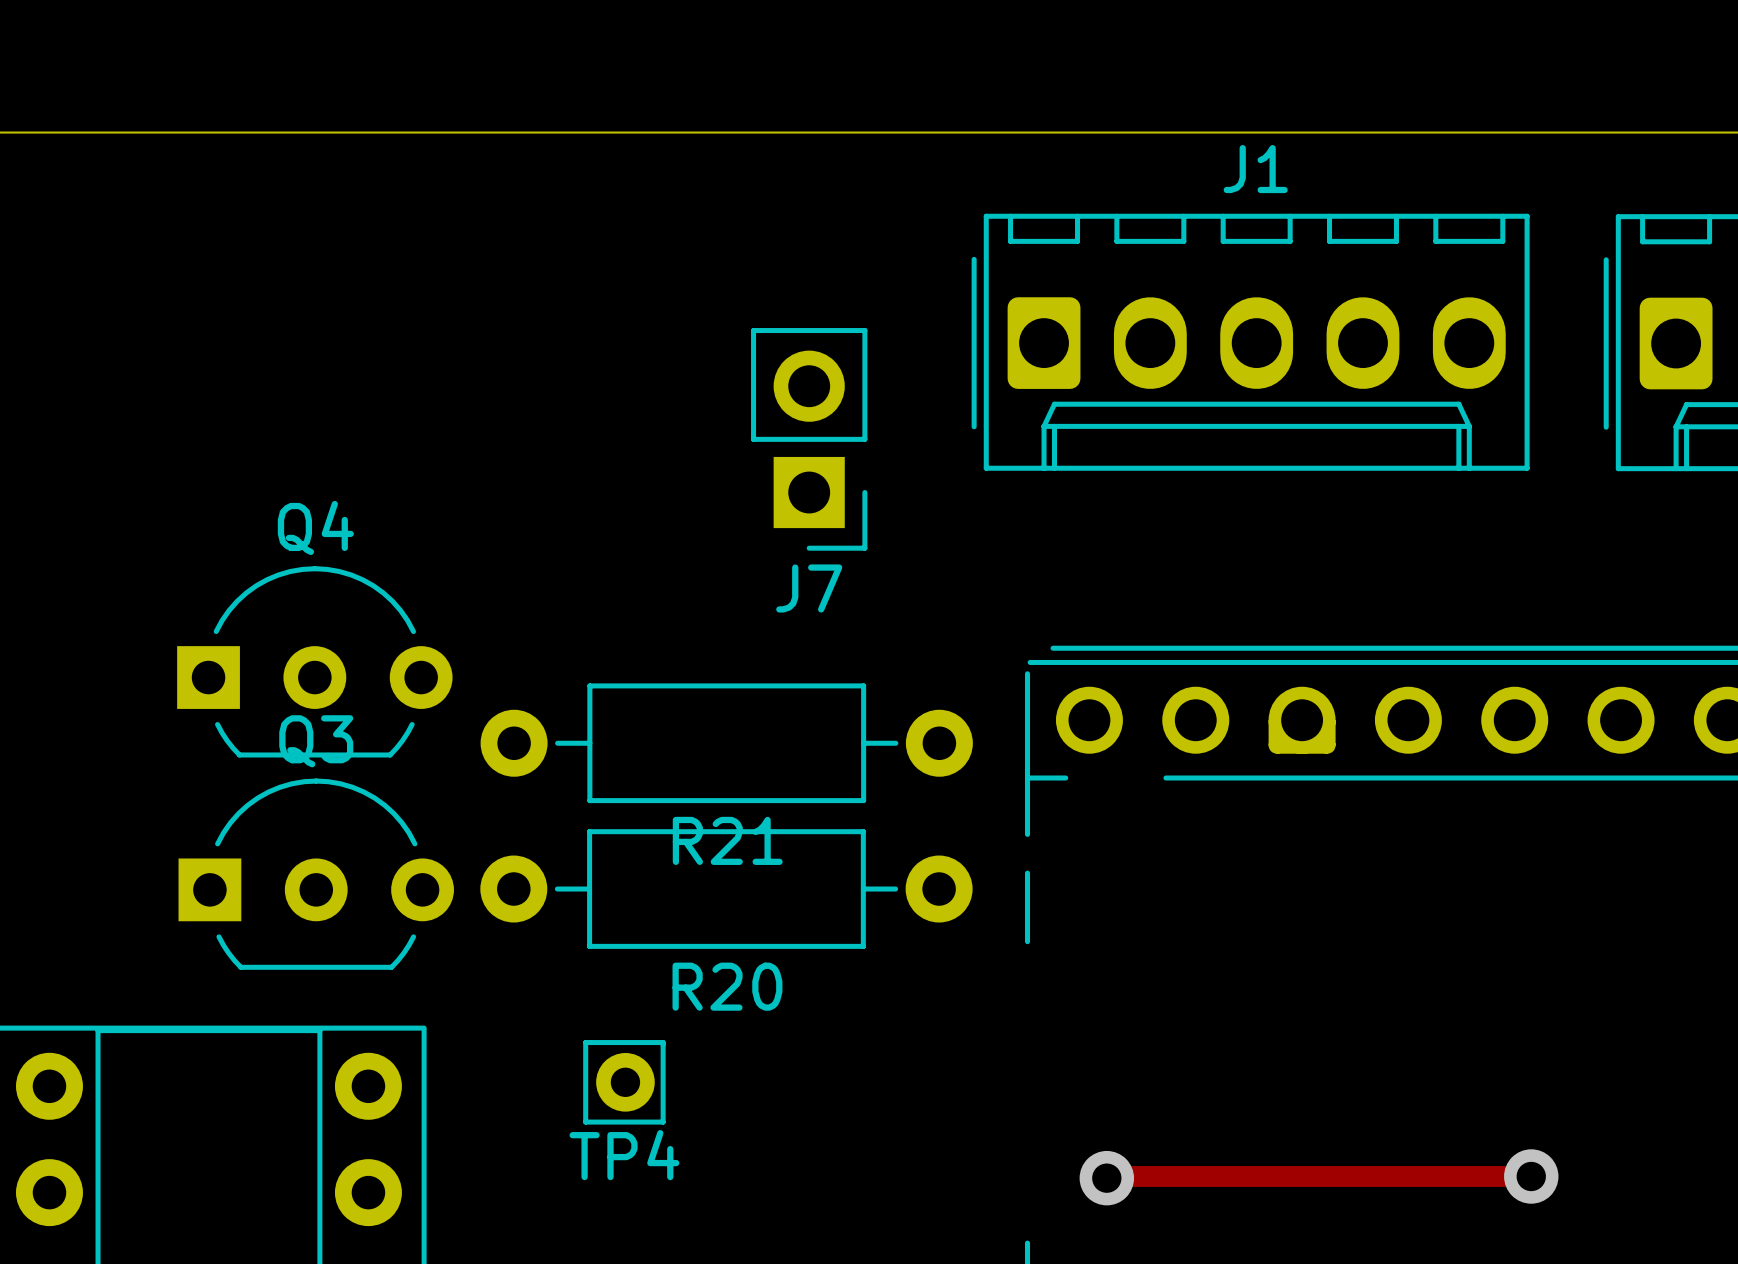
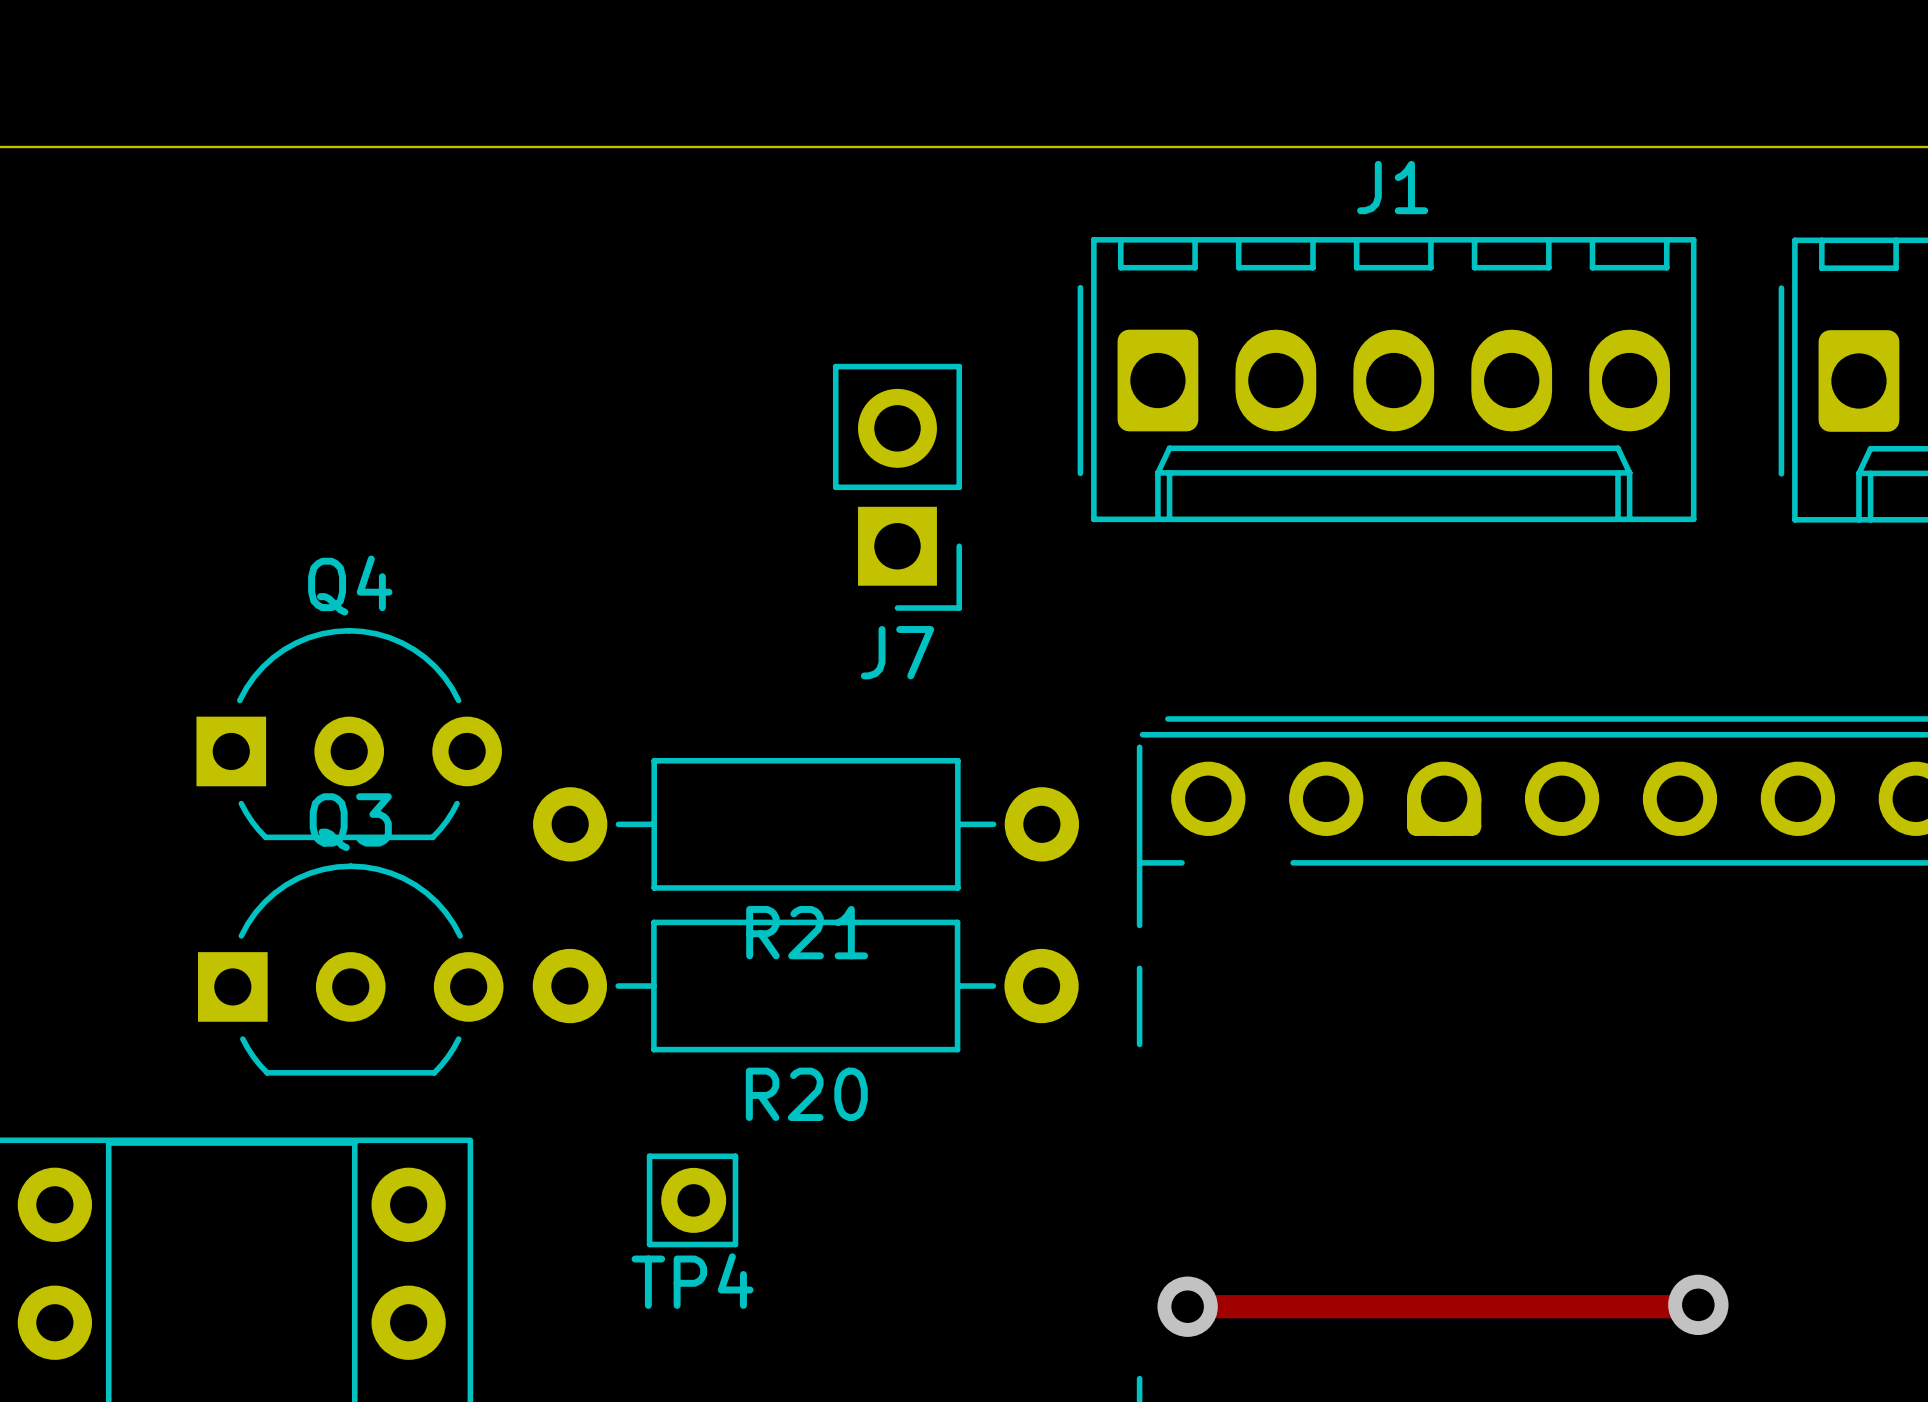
track: (1531, 1176) (1108, 1176) (1106, 1178) -> (1698, 1304) (1696, 1306) (1187, 1306)
via position: (1106, 1178) -> (1187, 1306)

